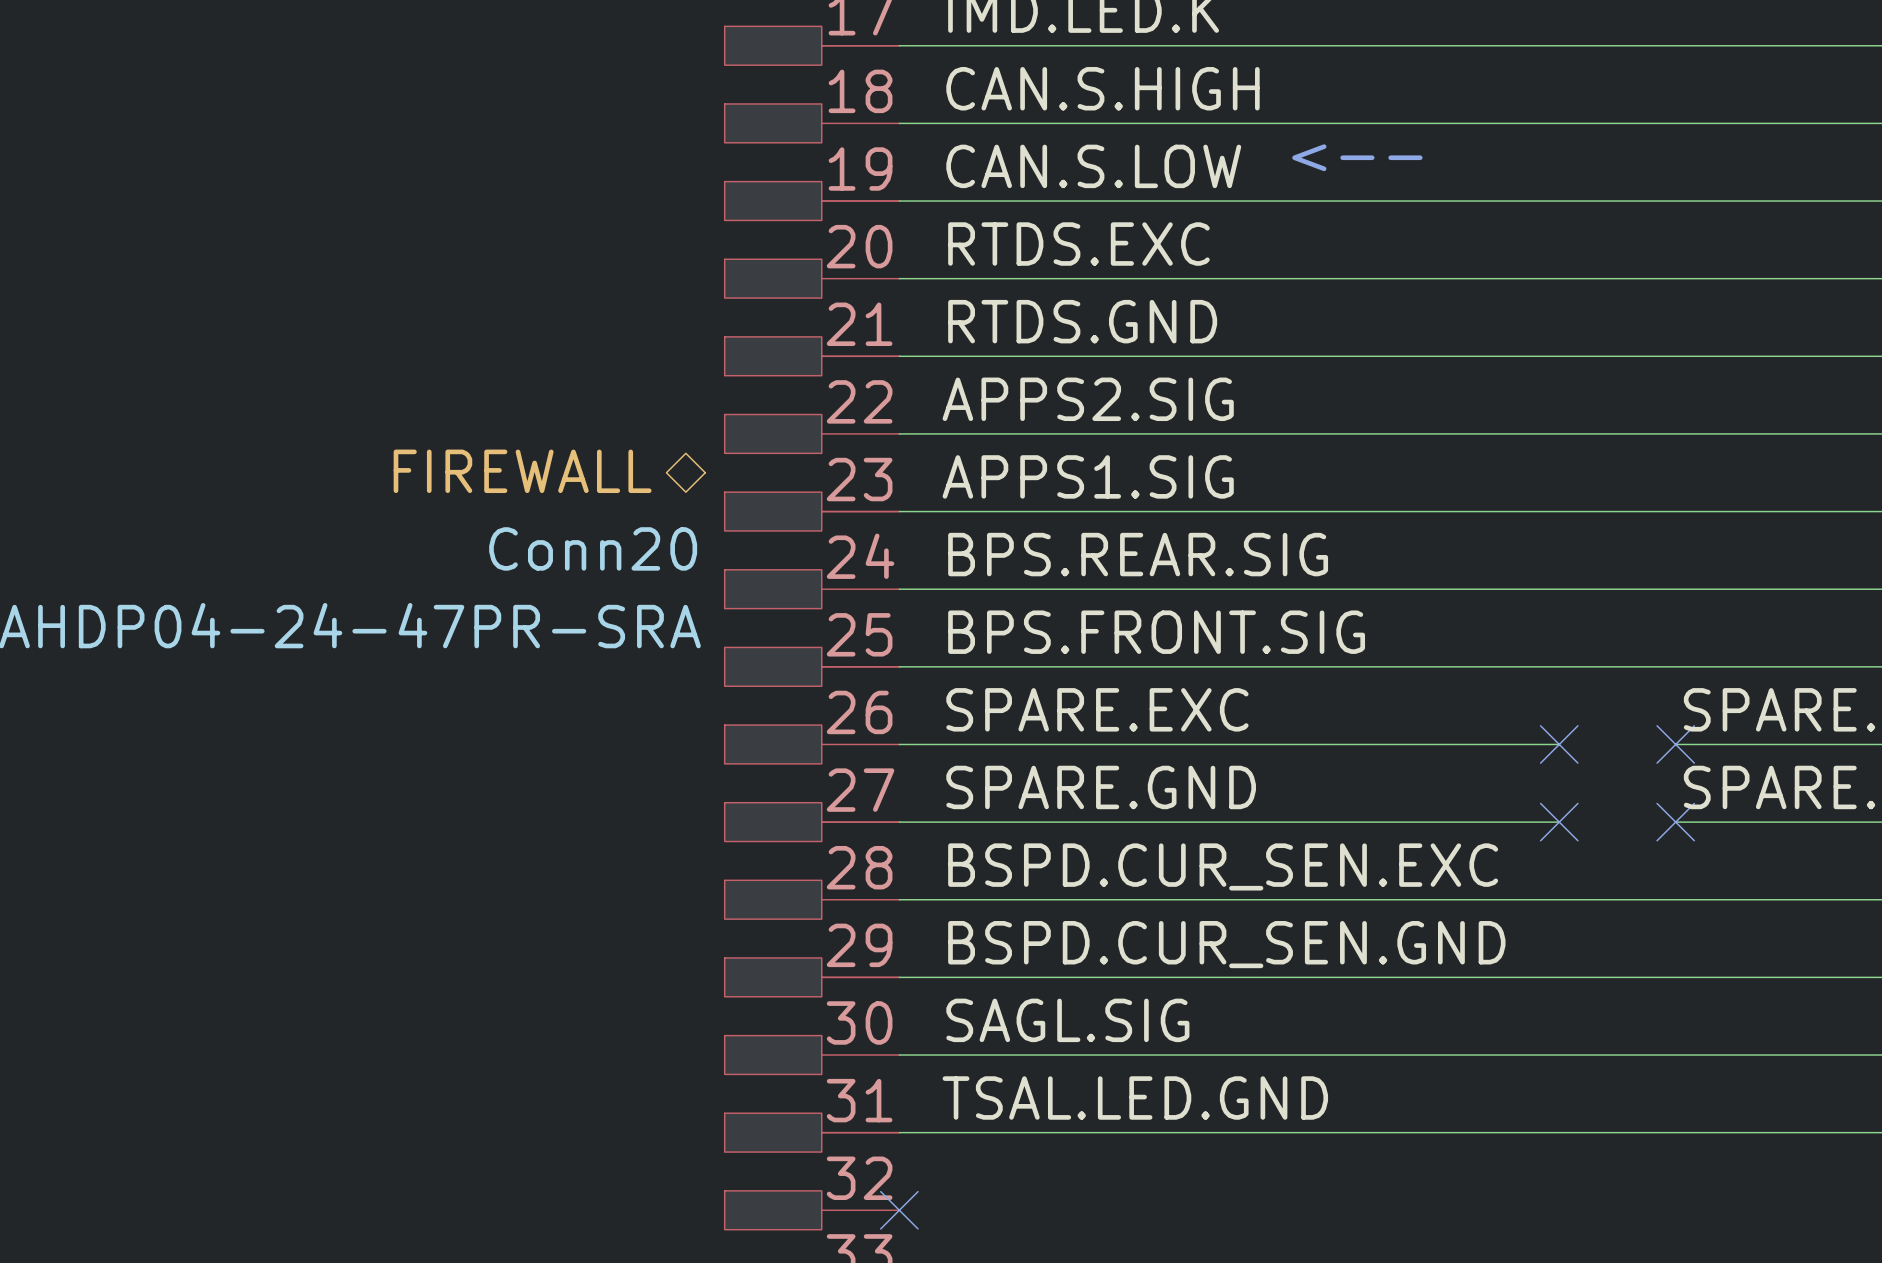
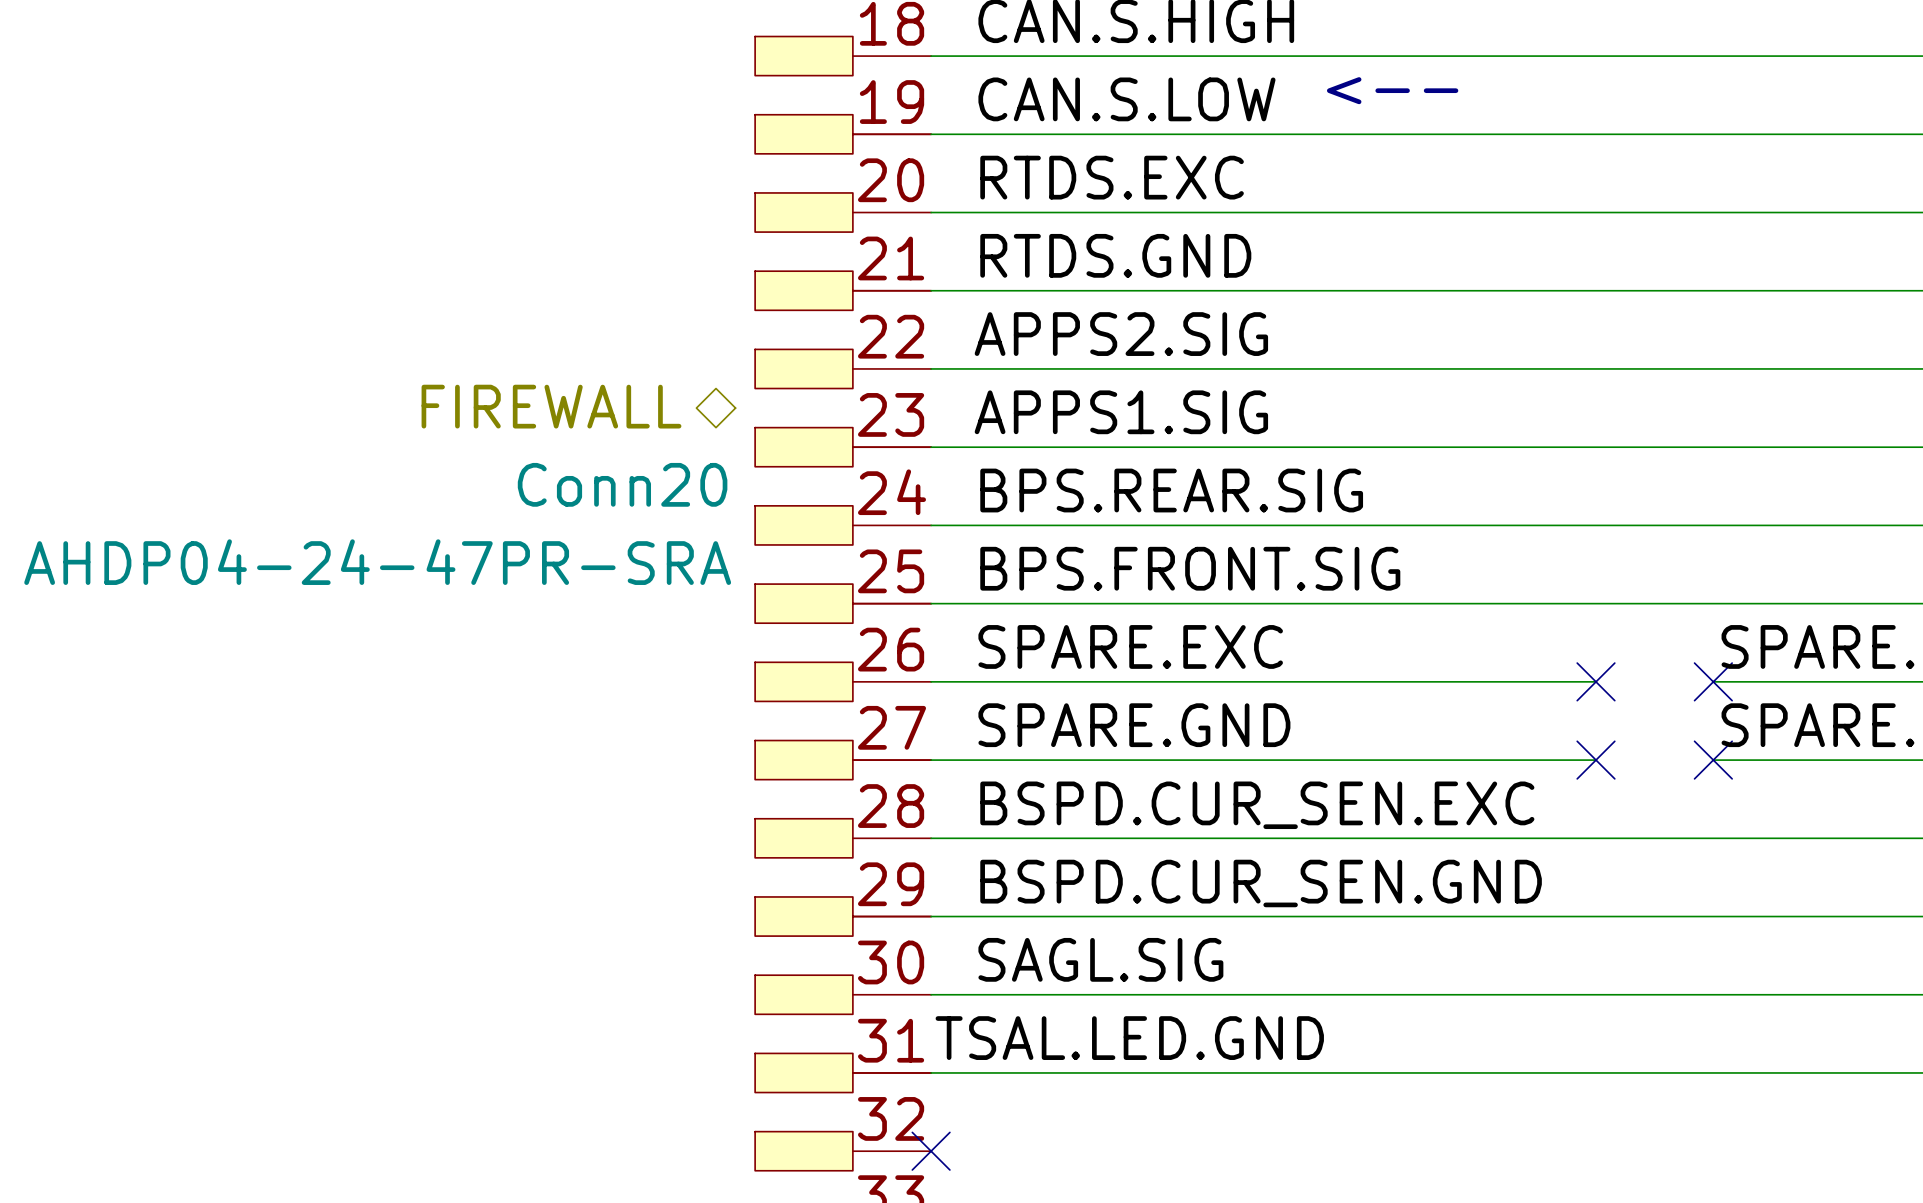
label position: TSAL.LED.GND (1135, 1098) -> TSAL.LED.GND (1129, 1038)

